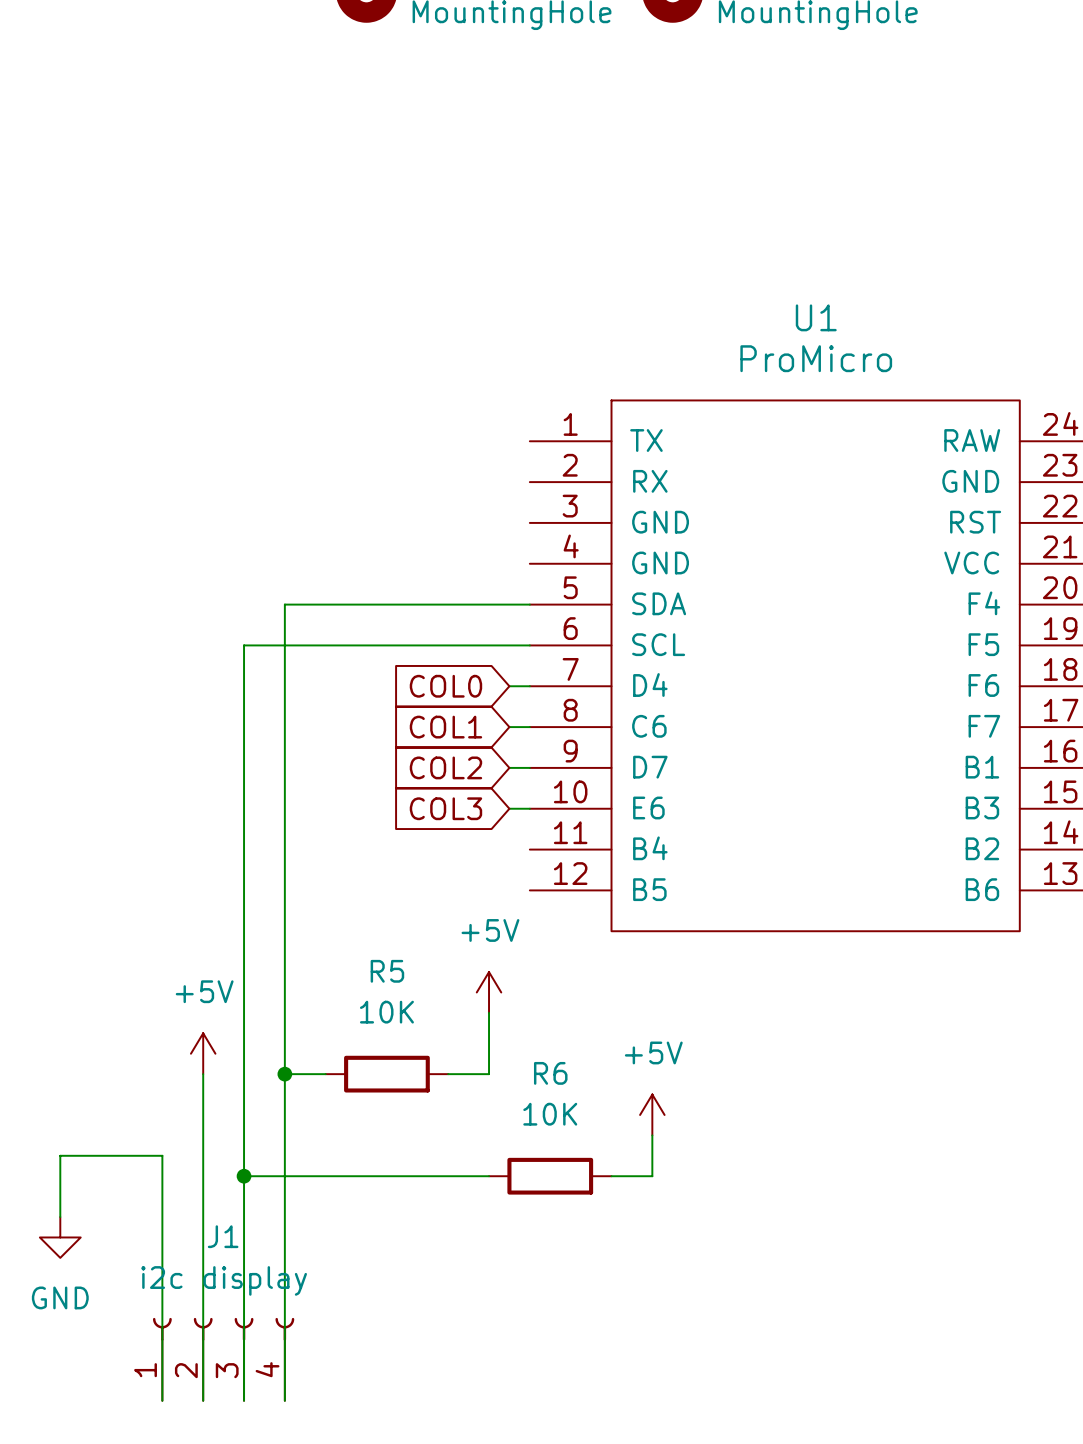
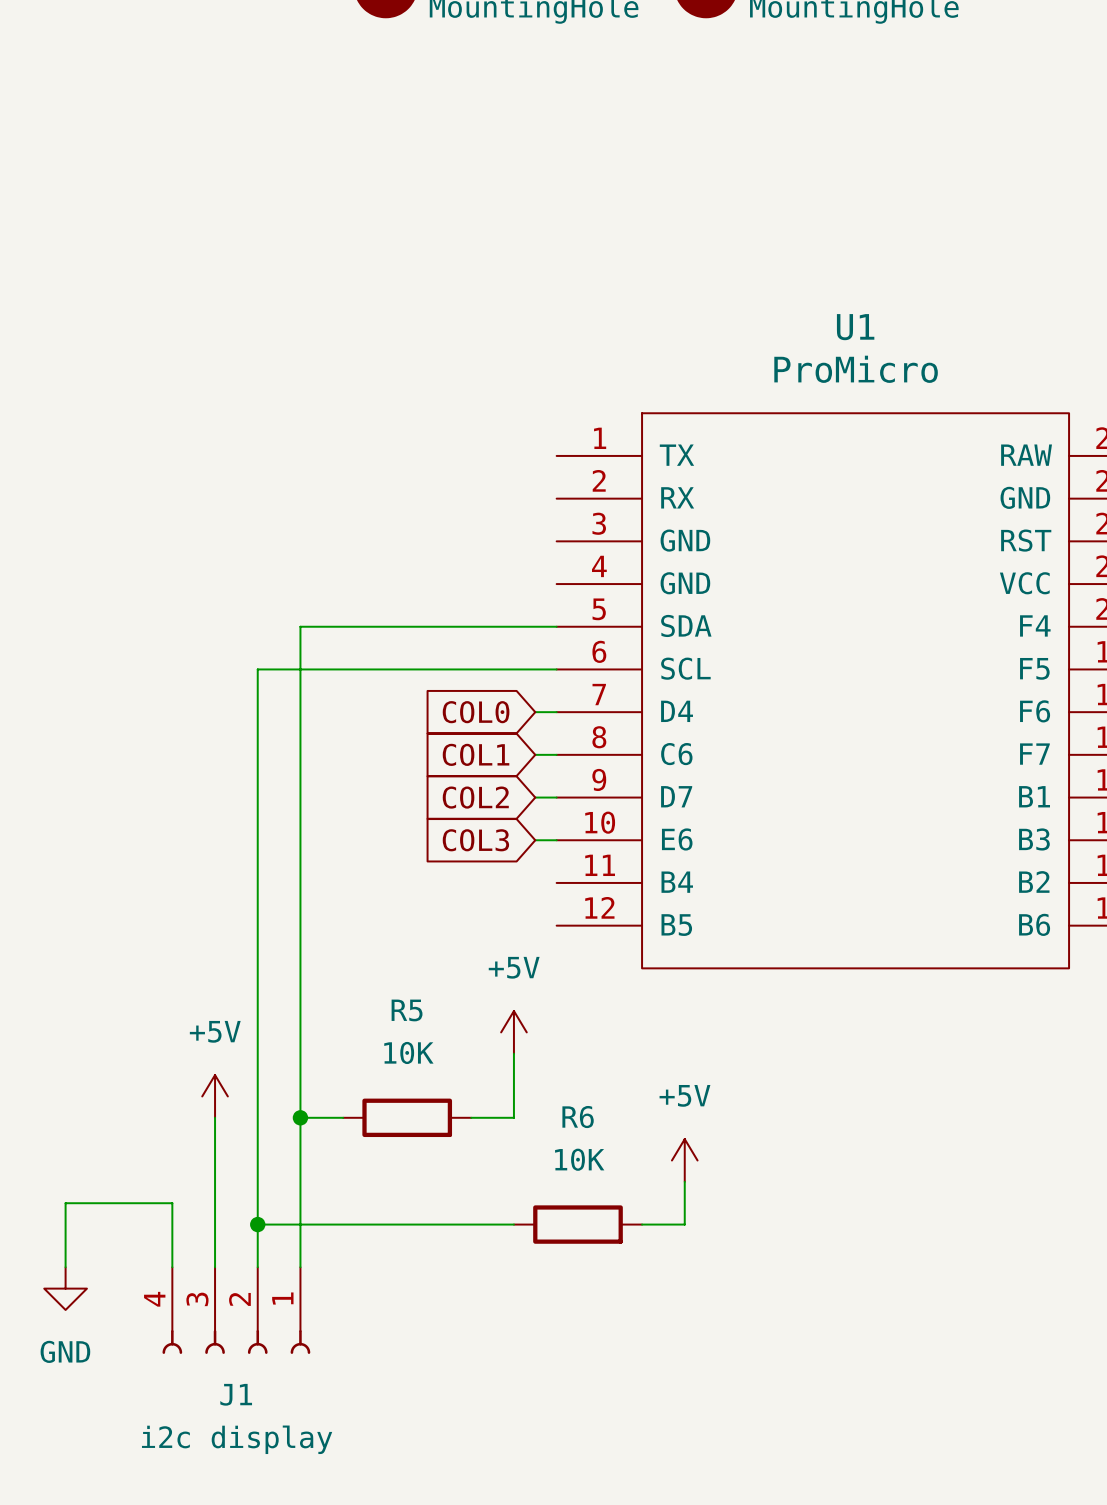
wire: (162, 1217) (162, 1400) -> none
wire: (203, 1217) (203, 1400) -> none
wire: (244, 1217) (244, 1400) -> none
wire: (284, 1217) (284, 1400) -> none
J1 name position: J1 (223, 1236) -> J1 (236, 1394)
J1 value position: i2c display (224, 1280) -> i2c display (237, 1439)
J1 rotation: 0° (223, 1329) -> 180° (236, 1341)
J1 position: (223, 1359) -> (236, 1310)

